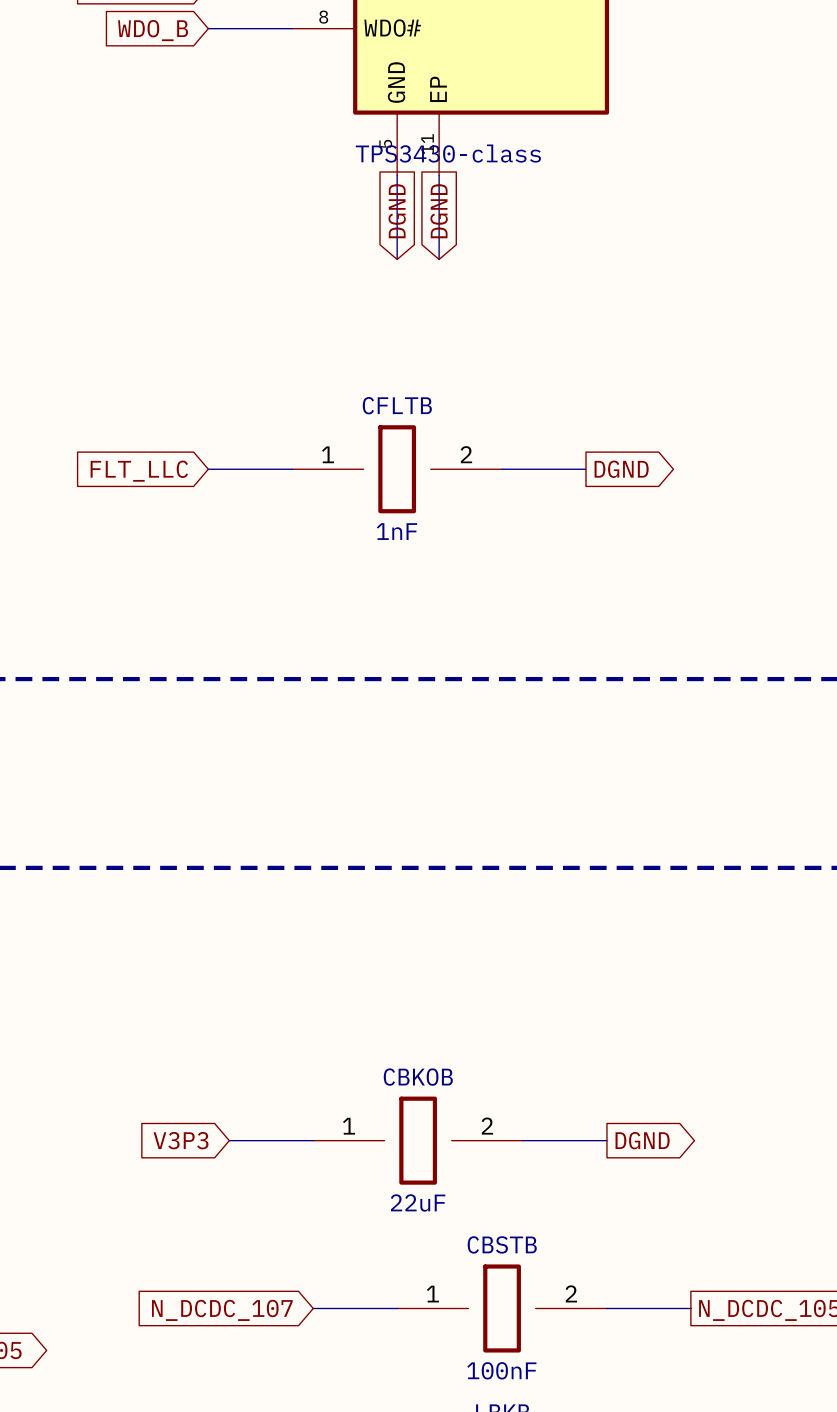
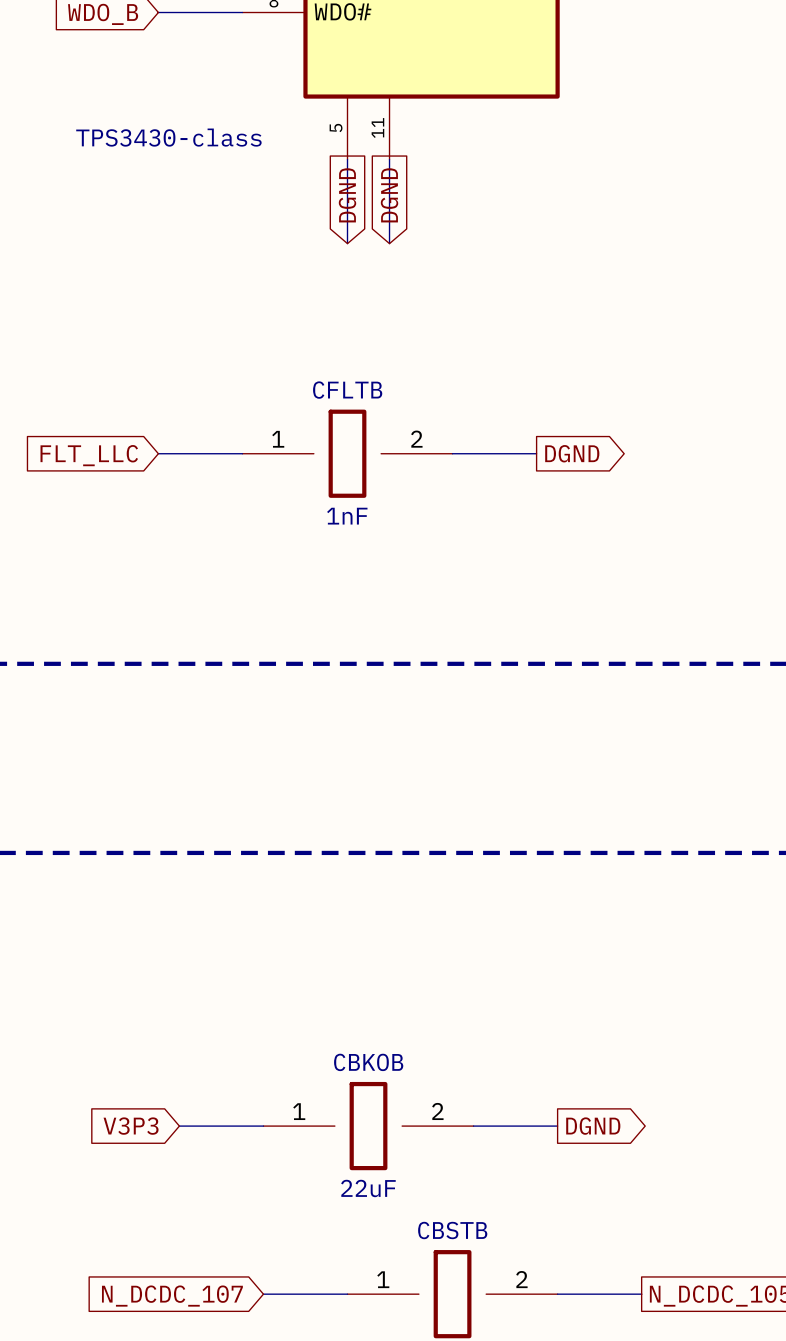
part pin name: GND (396, 82) -> none
part pin name: EP (438, 89) -> none
part value position: TPS3430-class (448, 153) -> TPS3430-class (168, 137)

